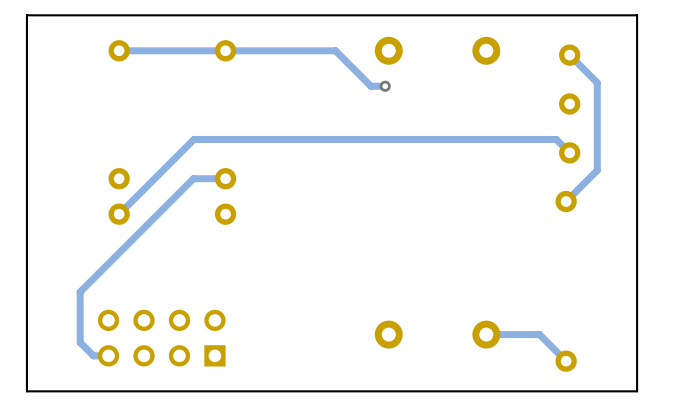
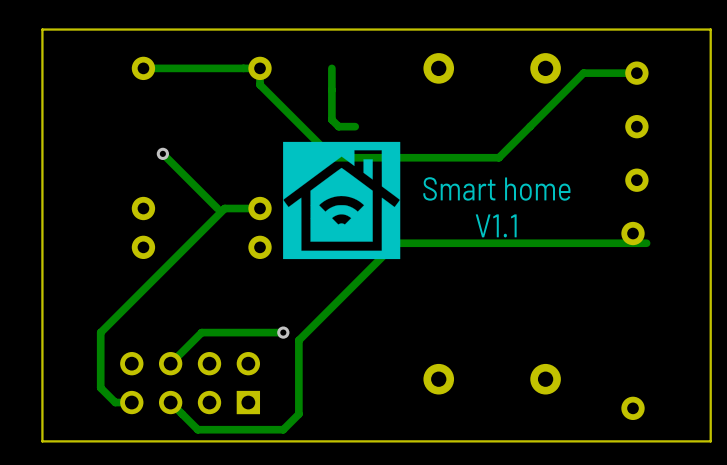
track: (225, 50) (335, 50) (371, 86) (385, 86) -> (260, 68) (260, 84) (332, 157) (498, 157) (583, 73) (636, 73)
track: none -> (331, 68) (331, 119) (338, 126) (355, 126)
track: (569, 55) (597, 82) (597, 170) (566, 201) -> none
via: (385, 86) -> none
drawing: none -> [283, 141, 401, 260]
track: none -> (162, 153) (217, 208)
via: none -> (162, 153)
track: (569, 152) (556, 139) (193, 139) (119, 214) -> none
text: none -> Smart home (496, 188)
text: none -> V1.1 (496, 225)
track: none -> (646, 243) (396, 243) (298, 340) (298, 414) (283, 429) (197, 429) (170, 402)
track: none -> (283, 332) (201, 332) (170, 363)
via: none -> (283, 332)
track: (486, 334) (539, 334) (566, 361) -> none

